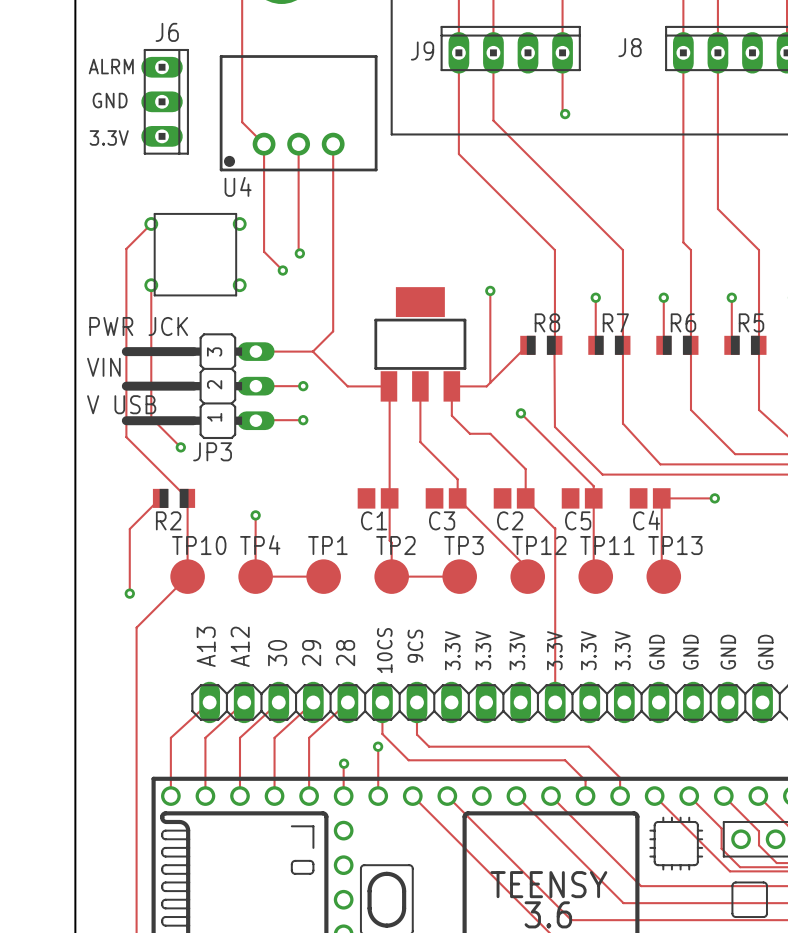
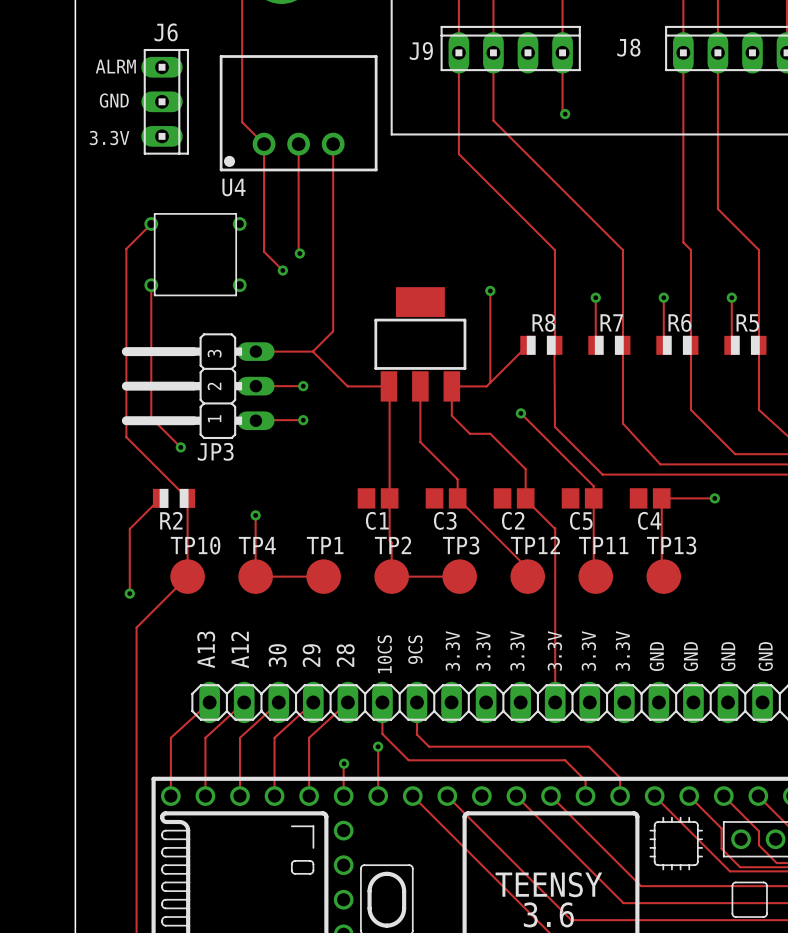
text: PWR JCK (138, 326) -> none
text: VIN (103, 367) -> none
text: V USB (121, 404) -> none

